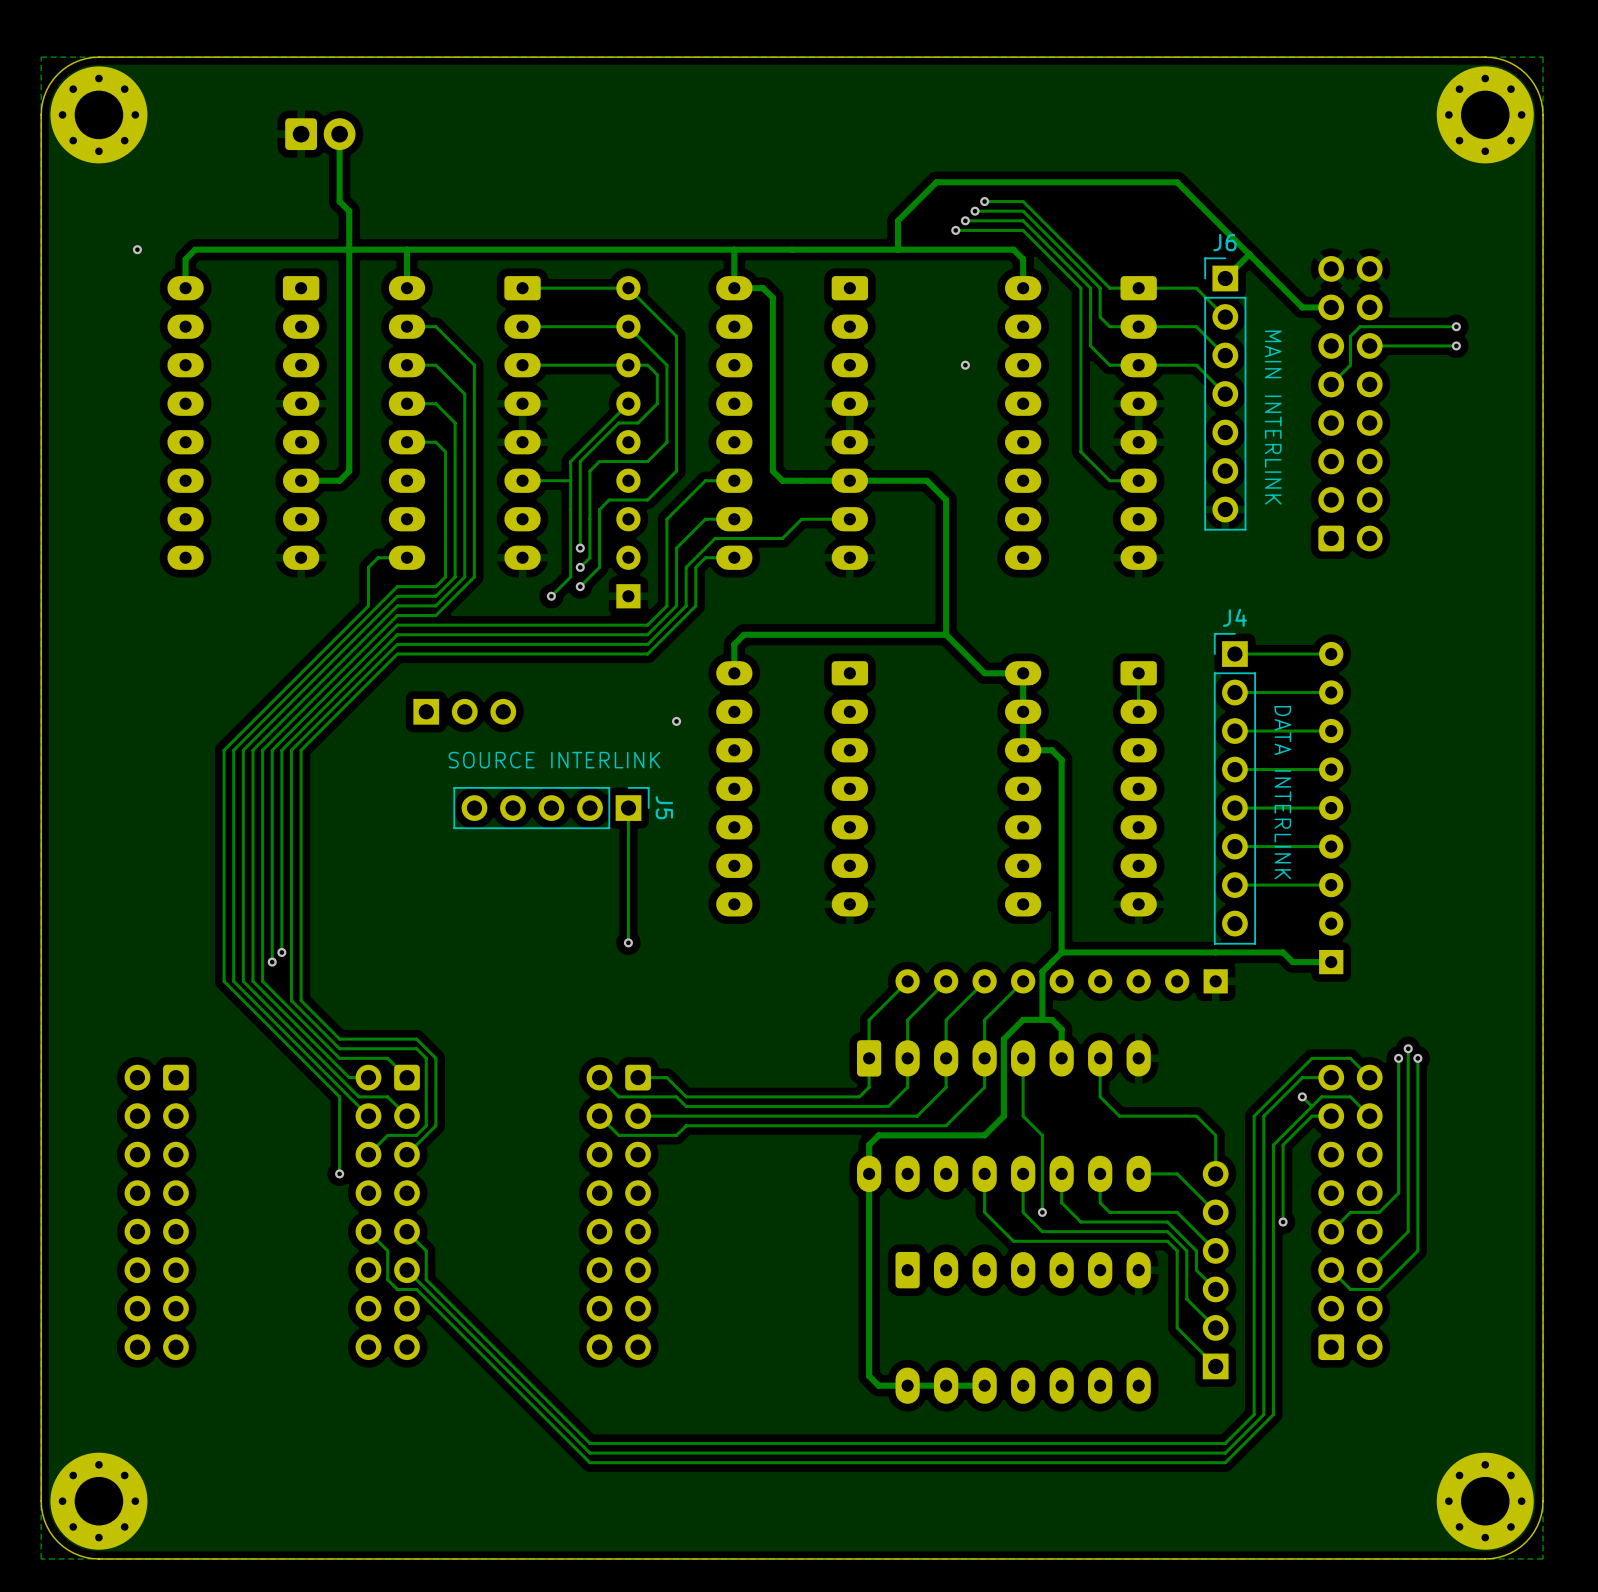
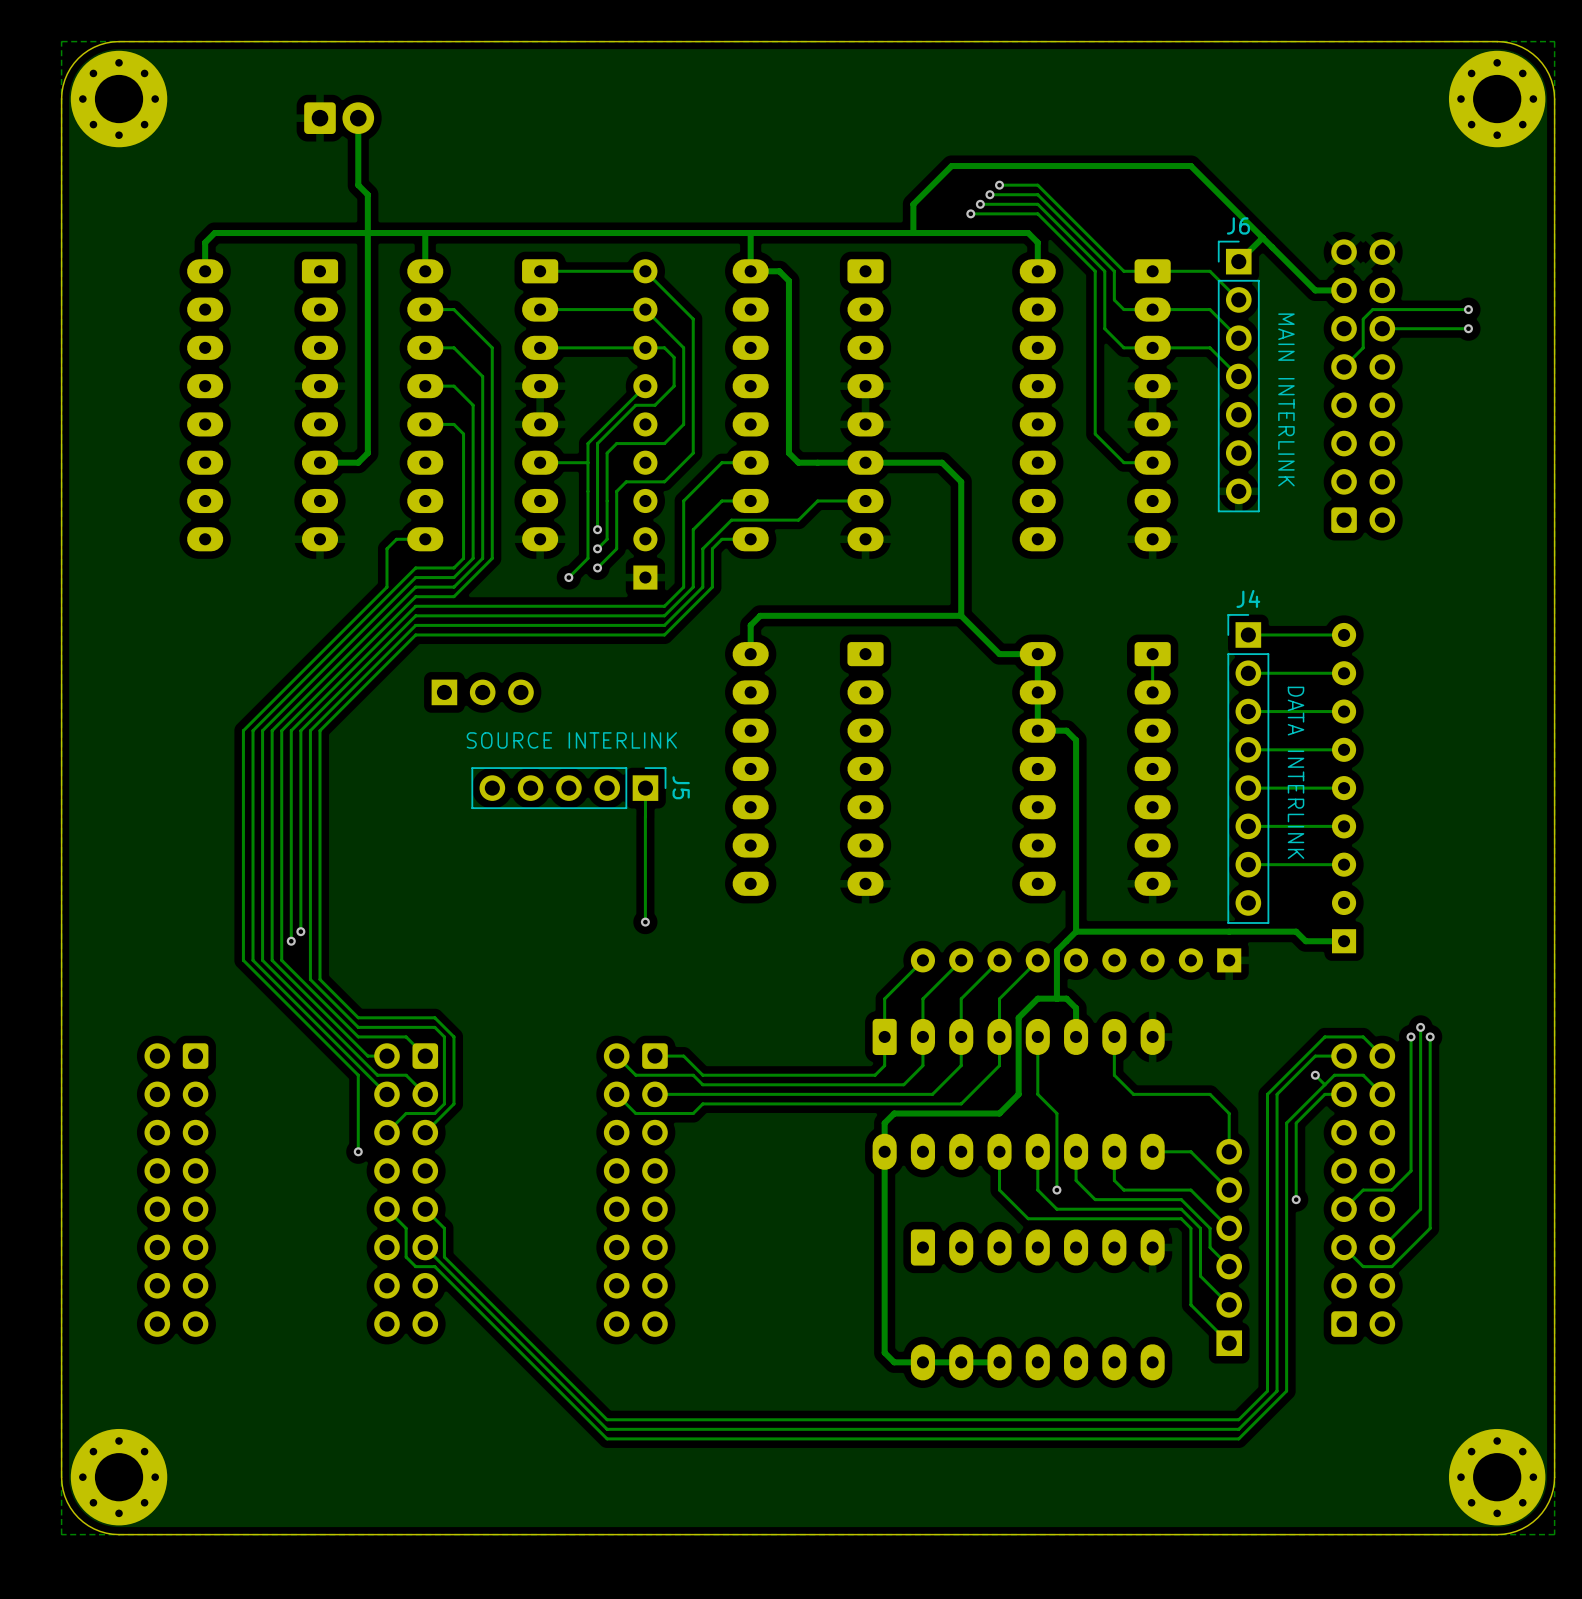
via: (137, 249) -> none
via: (965, 365) -> none
via: (676, 721) -> none

